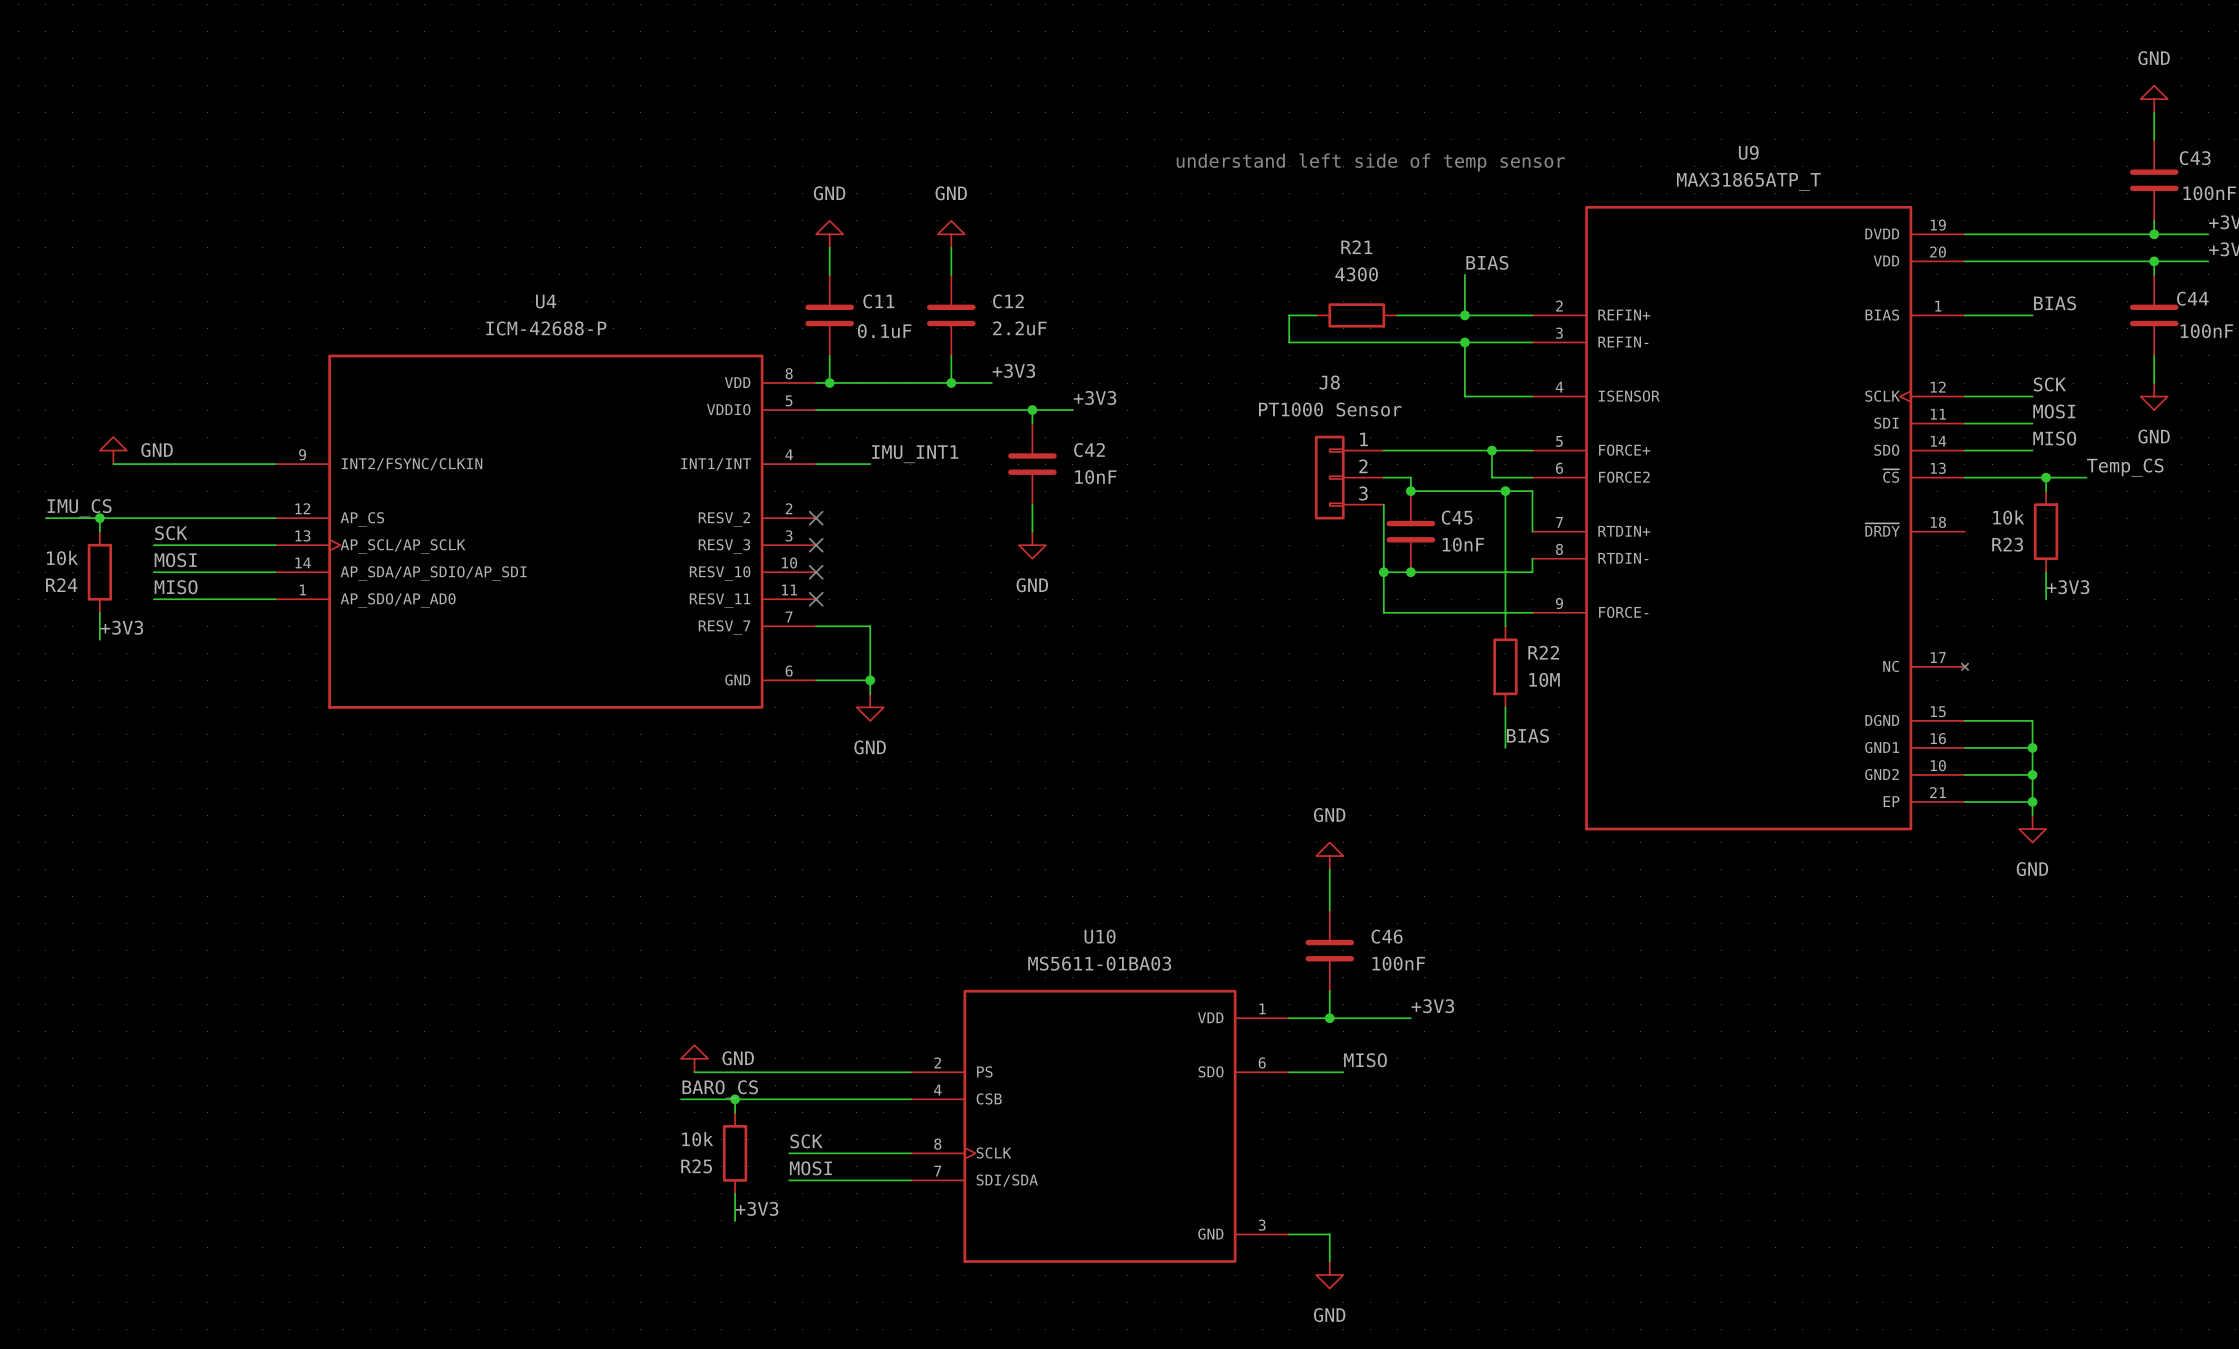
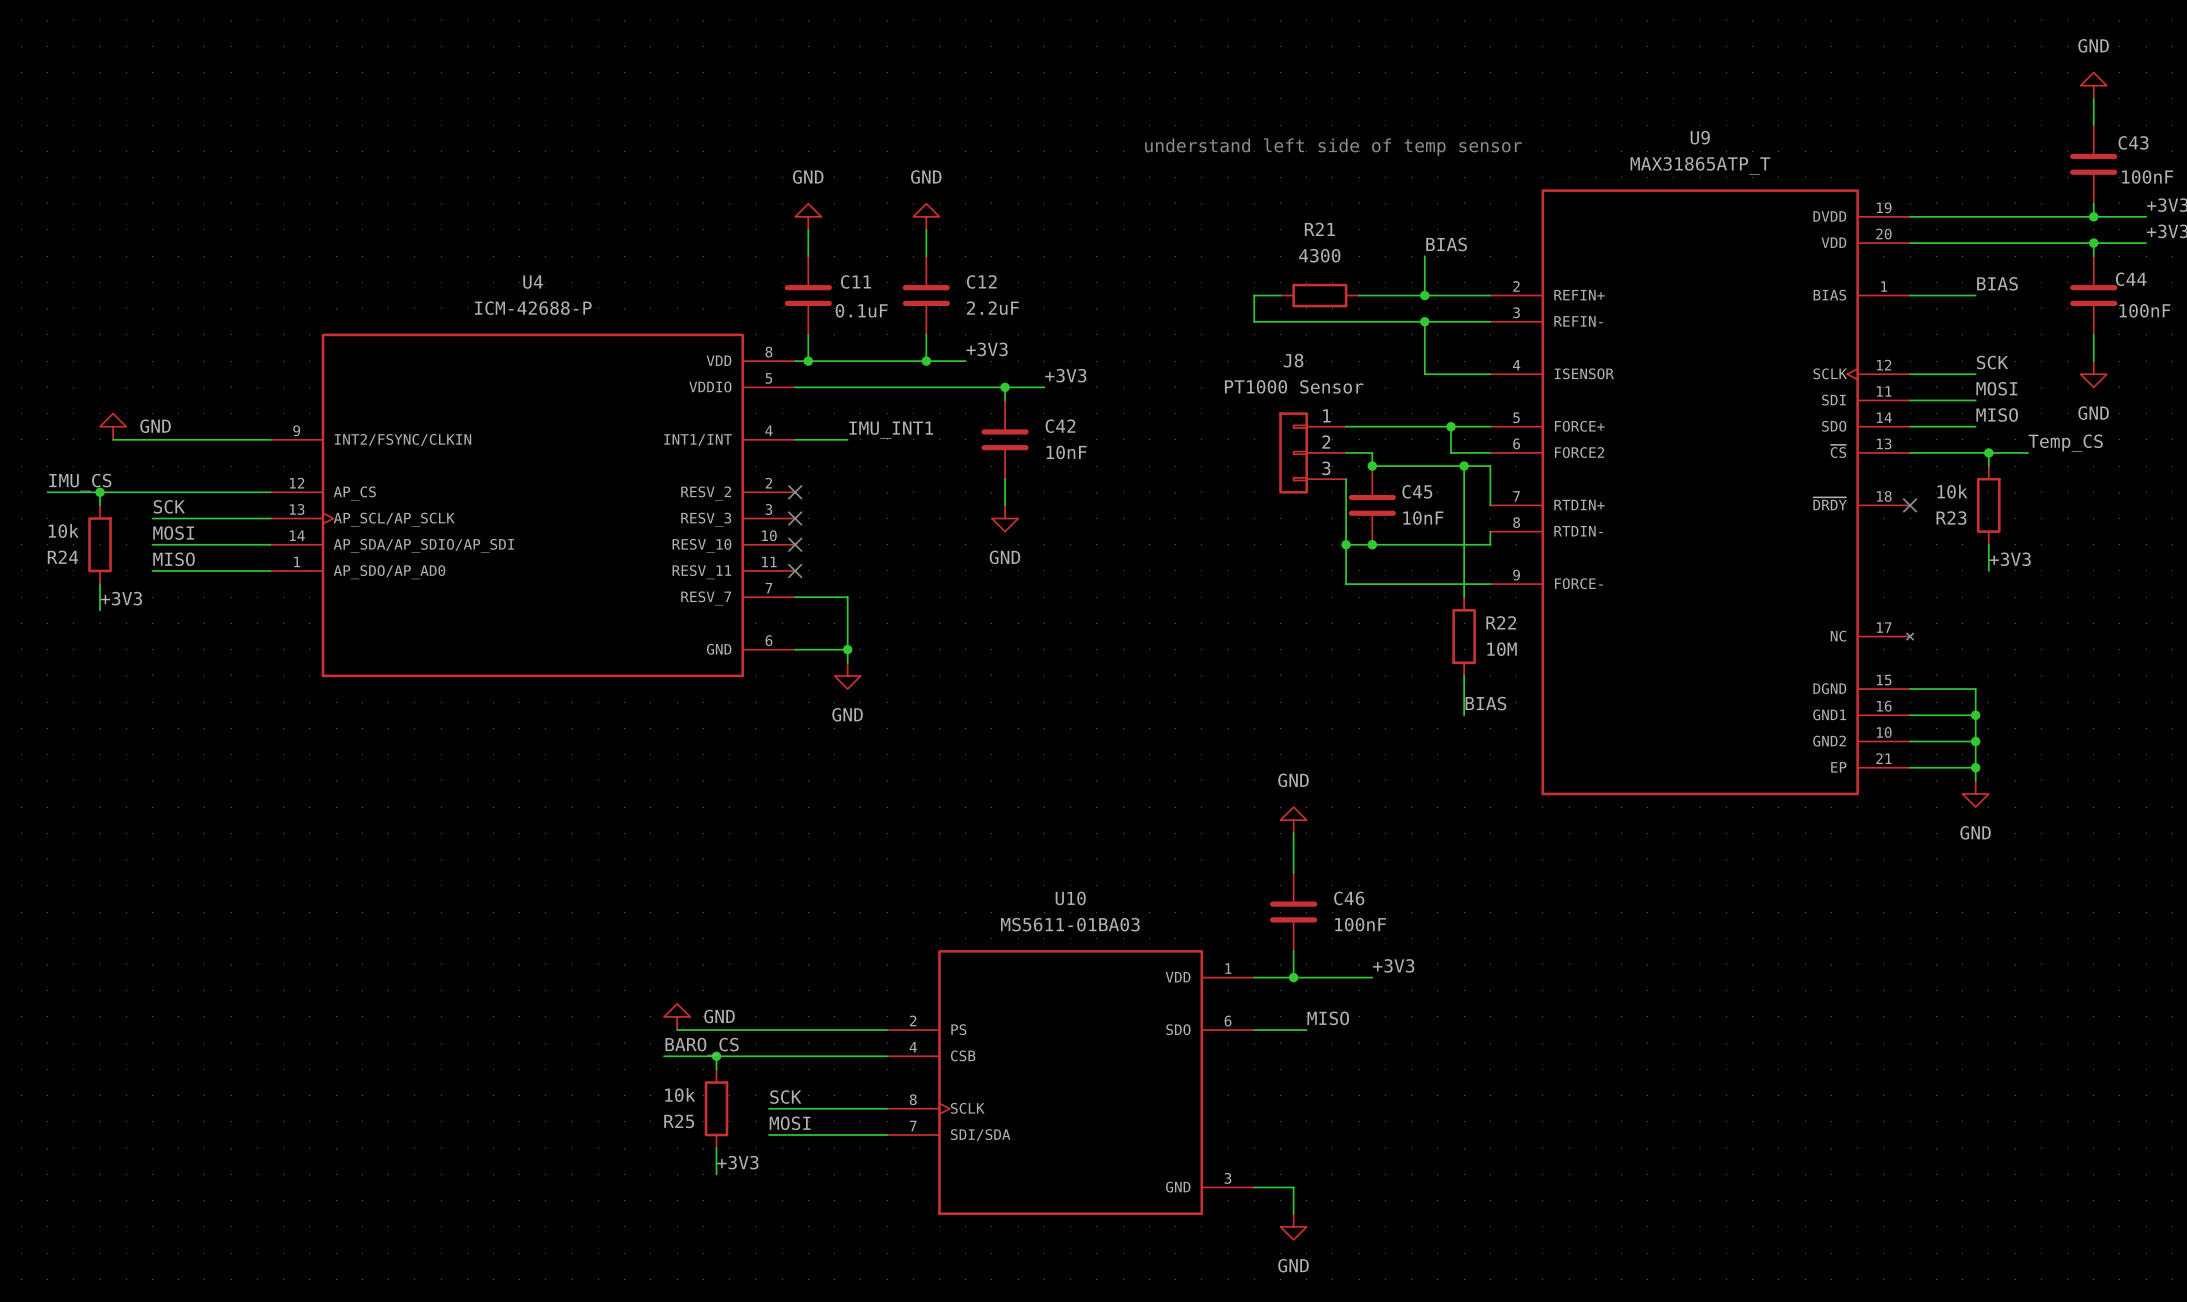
no-connect mark: none -> (1910, 505)

